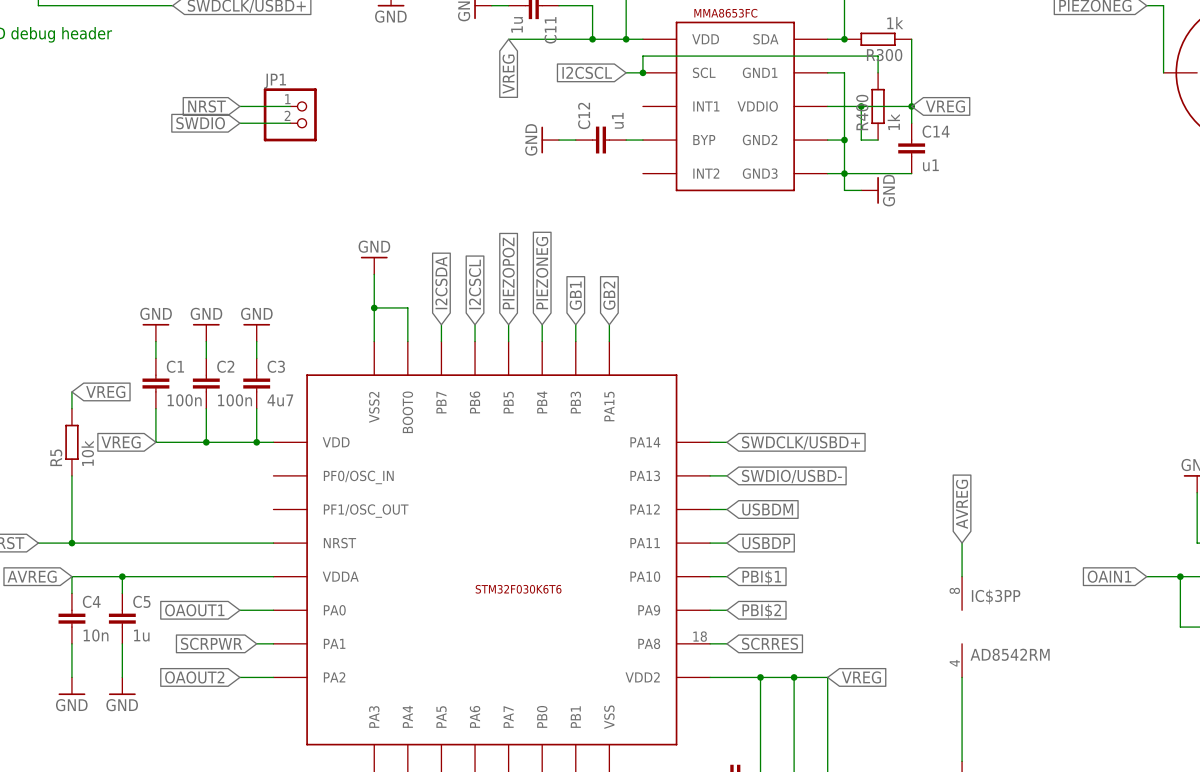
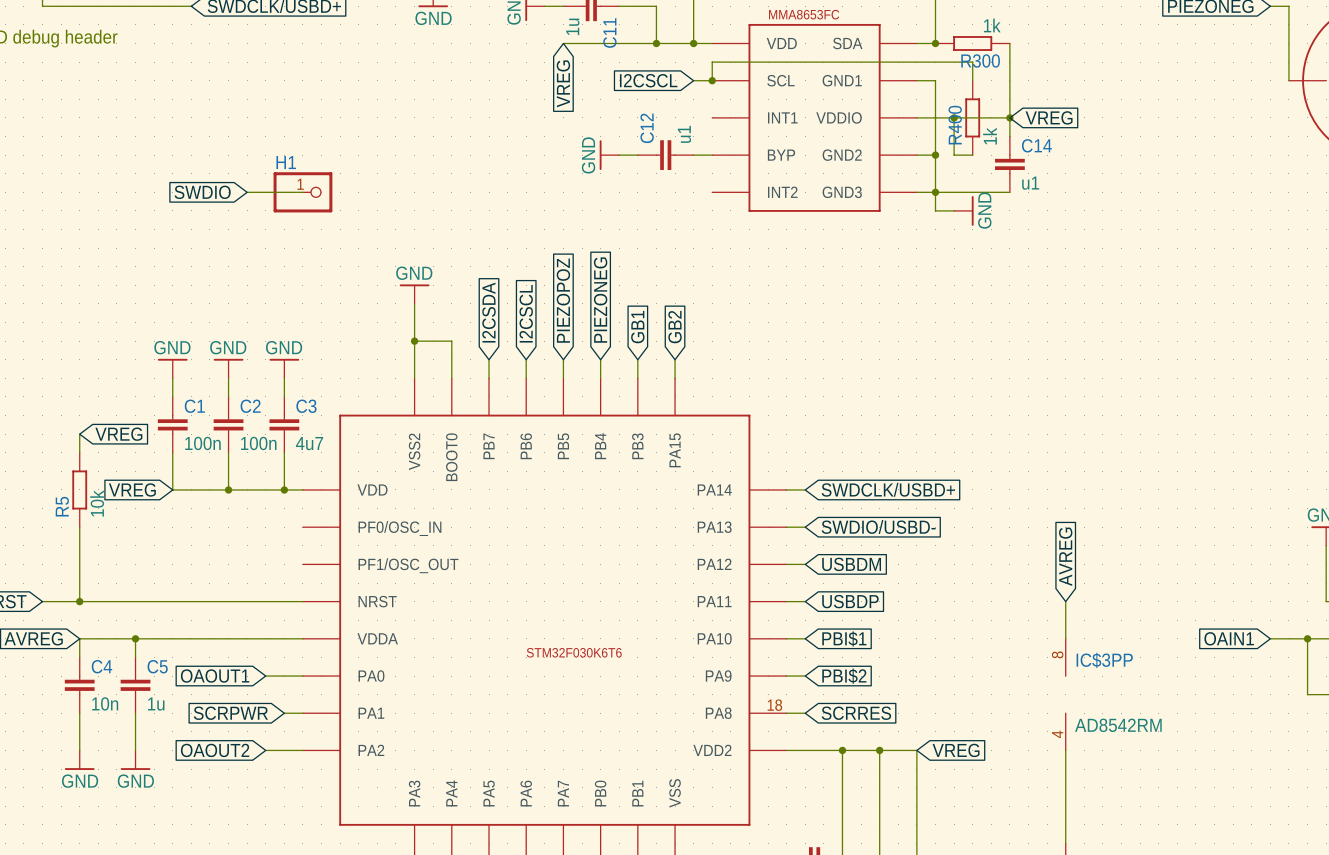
global label: NRST (207, 106) -> none
wire: (239, 106) (290, 106) -> none
JP1: (290, 114) -> none
global label position: SWDIO (200, 123) -> SWDIO (202, 192)
wire: (239, 123) (290, 123) -> (247, 192) (302, 192)
H1: none -> (302, 192)

